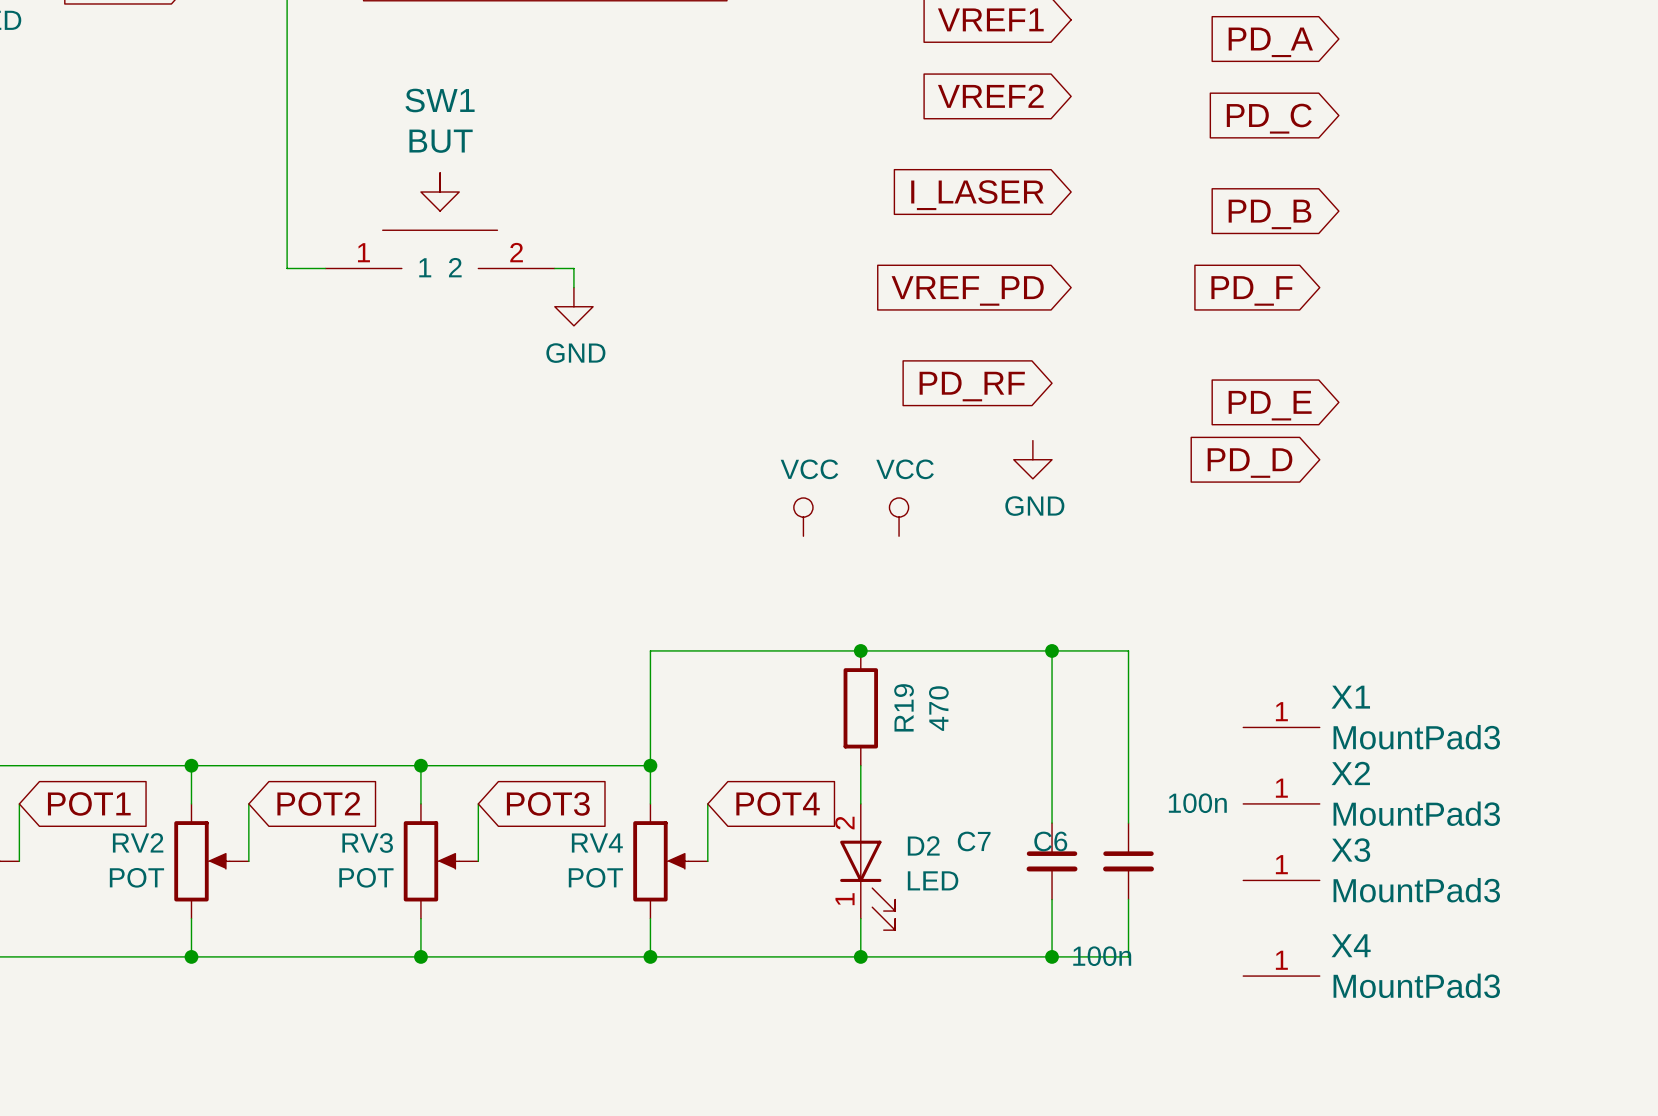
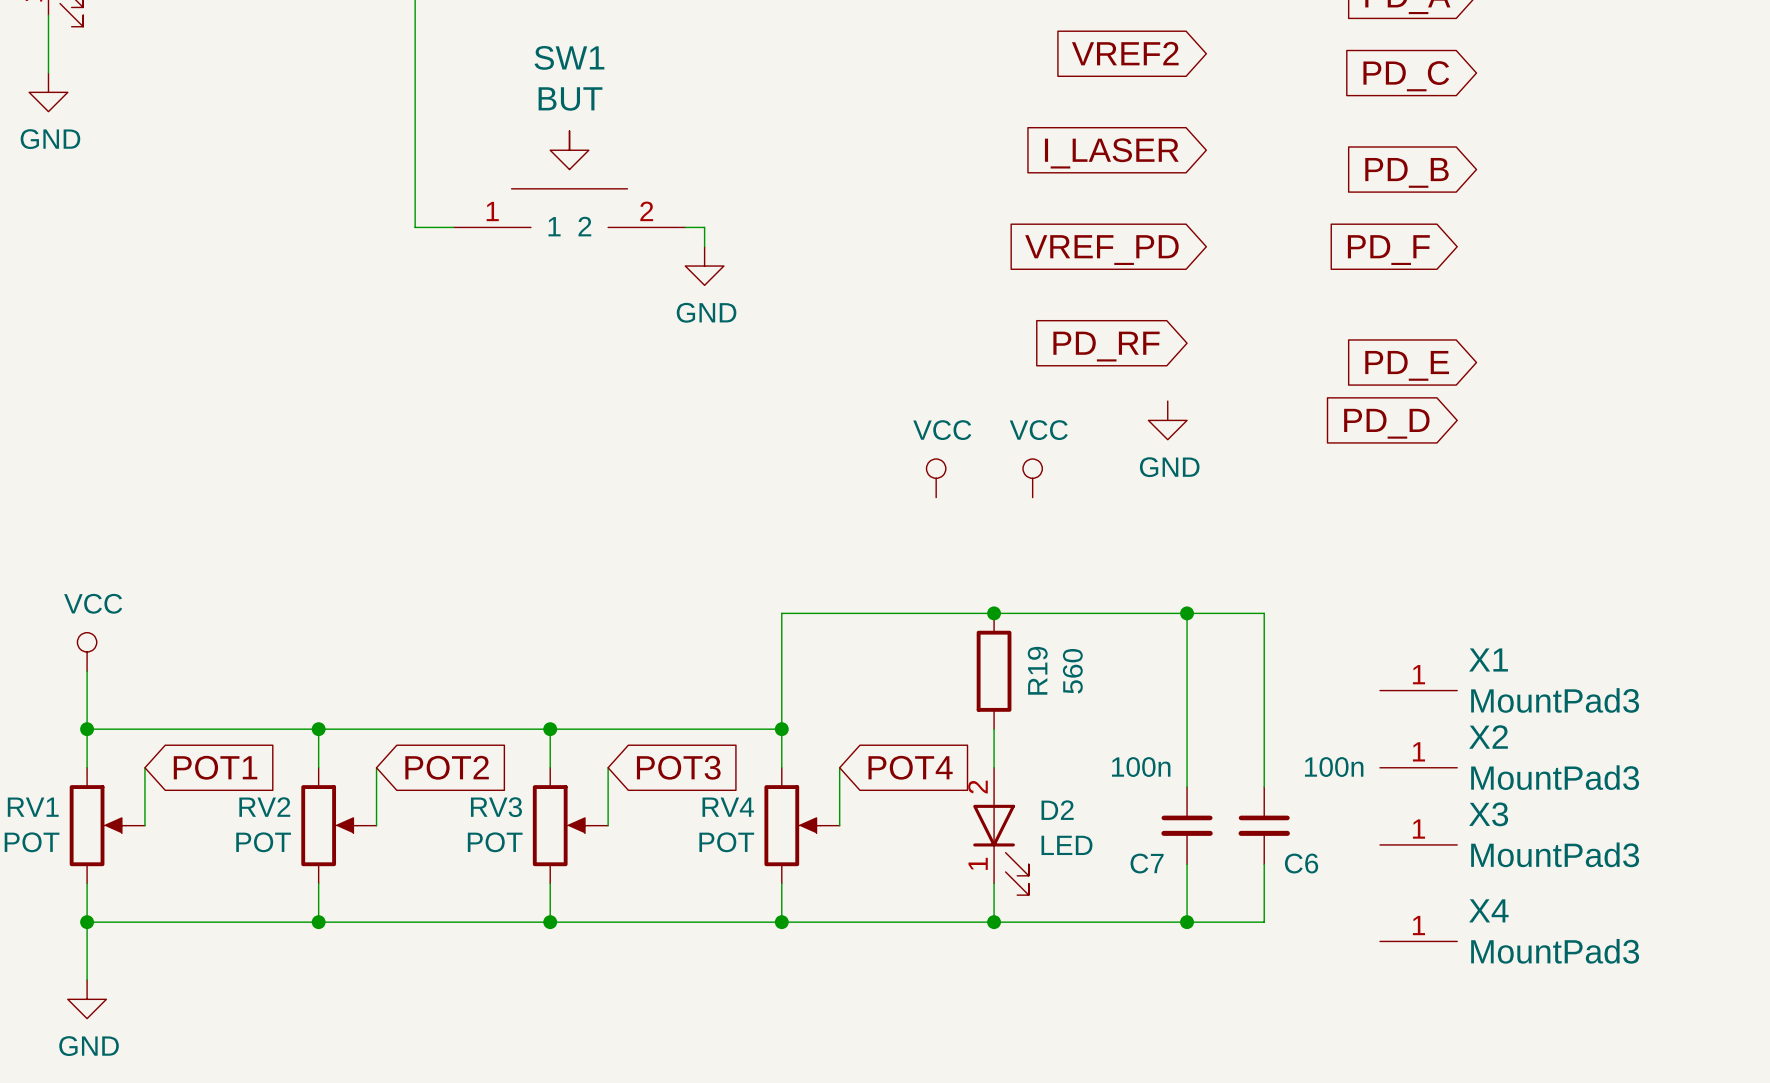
R19 value: 470 (938, 708) -> 560 (1072, 671)
C7 name position: C7 (974, 841) -> C7 (1147, 863)
C6 name position: C6 (1050, 841) -> C6 (1301, 863)
C7 value position: 100n (1102, 956) -> 100n (1141, 767)

